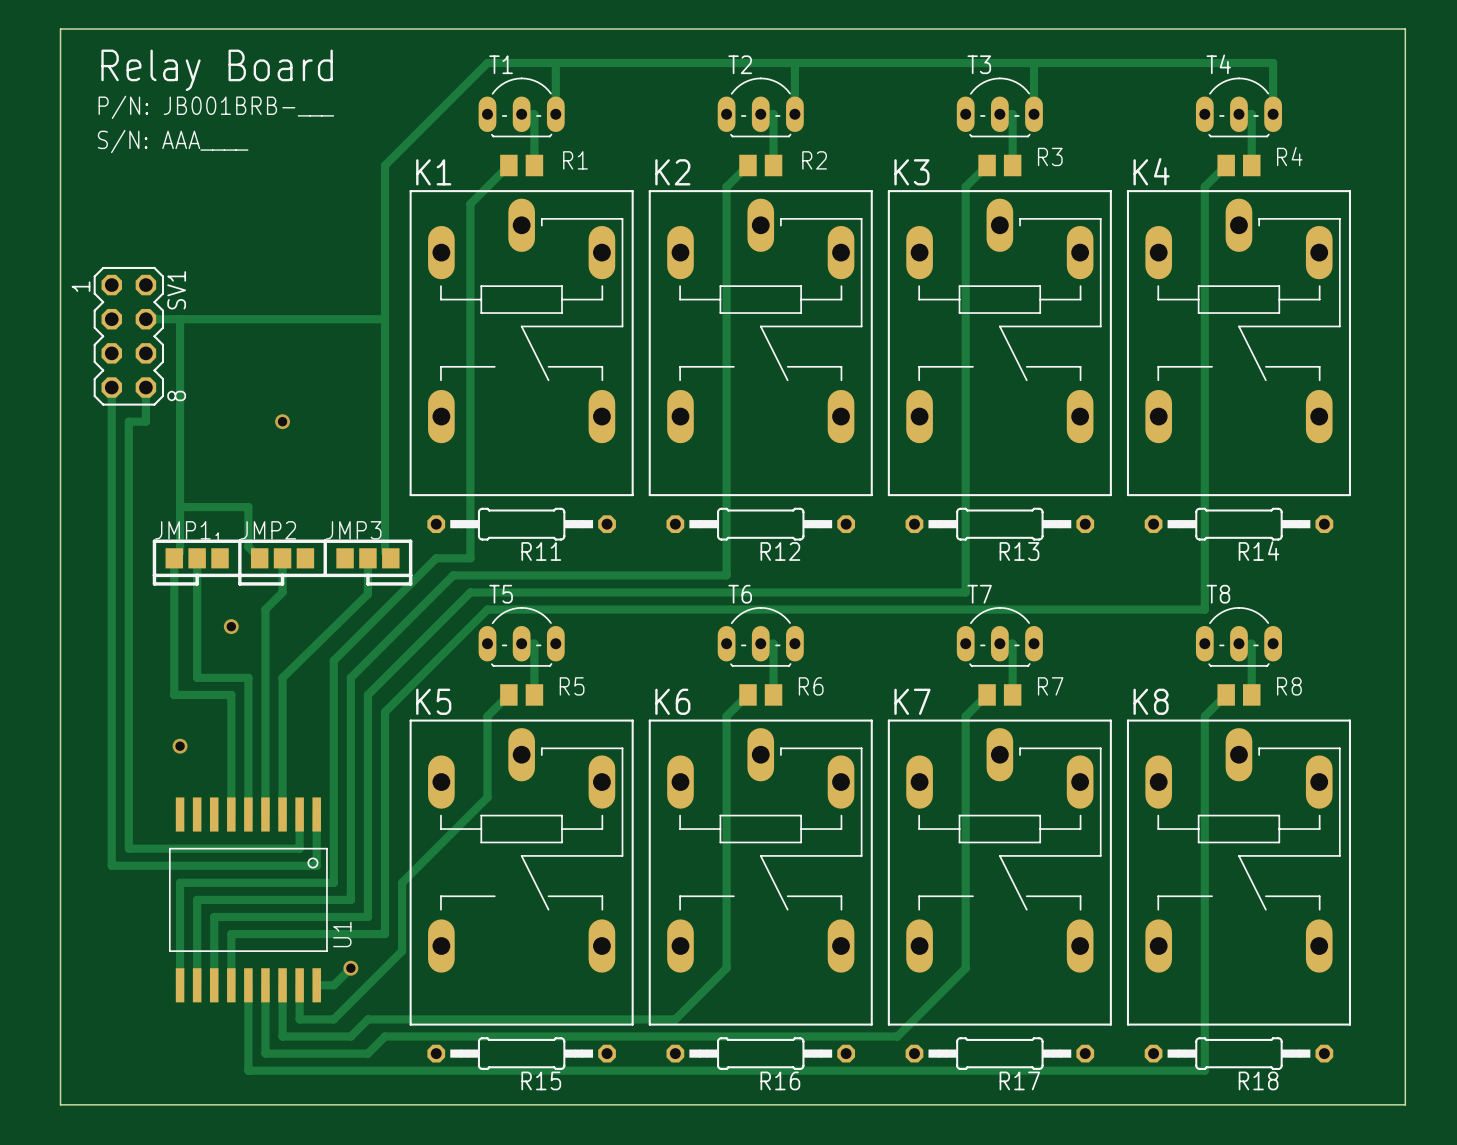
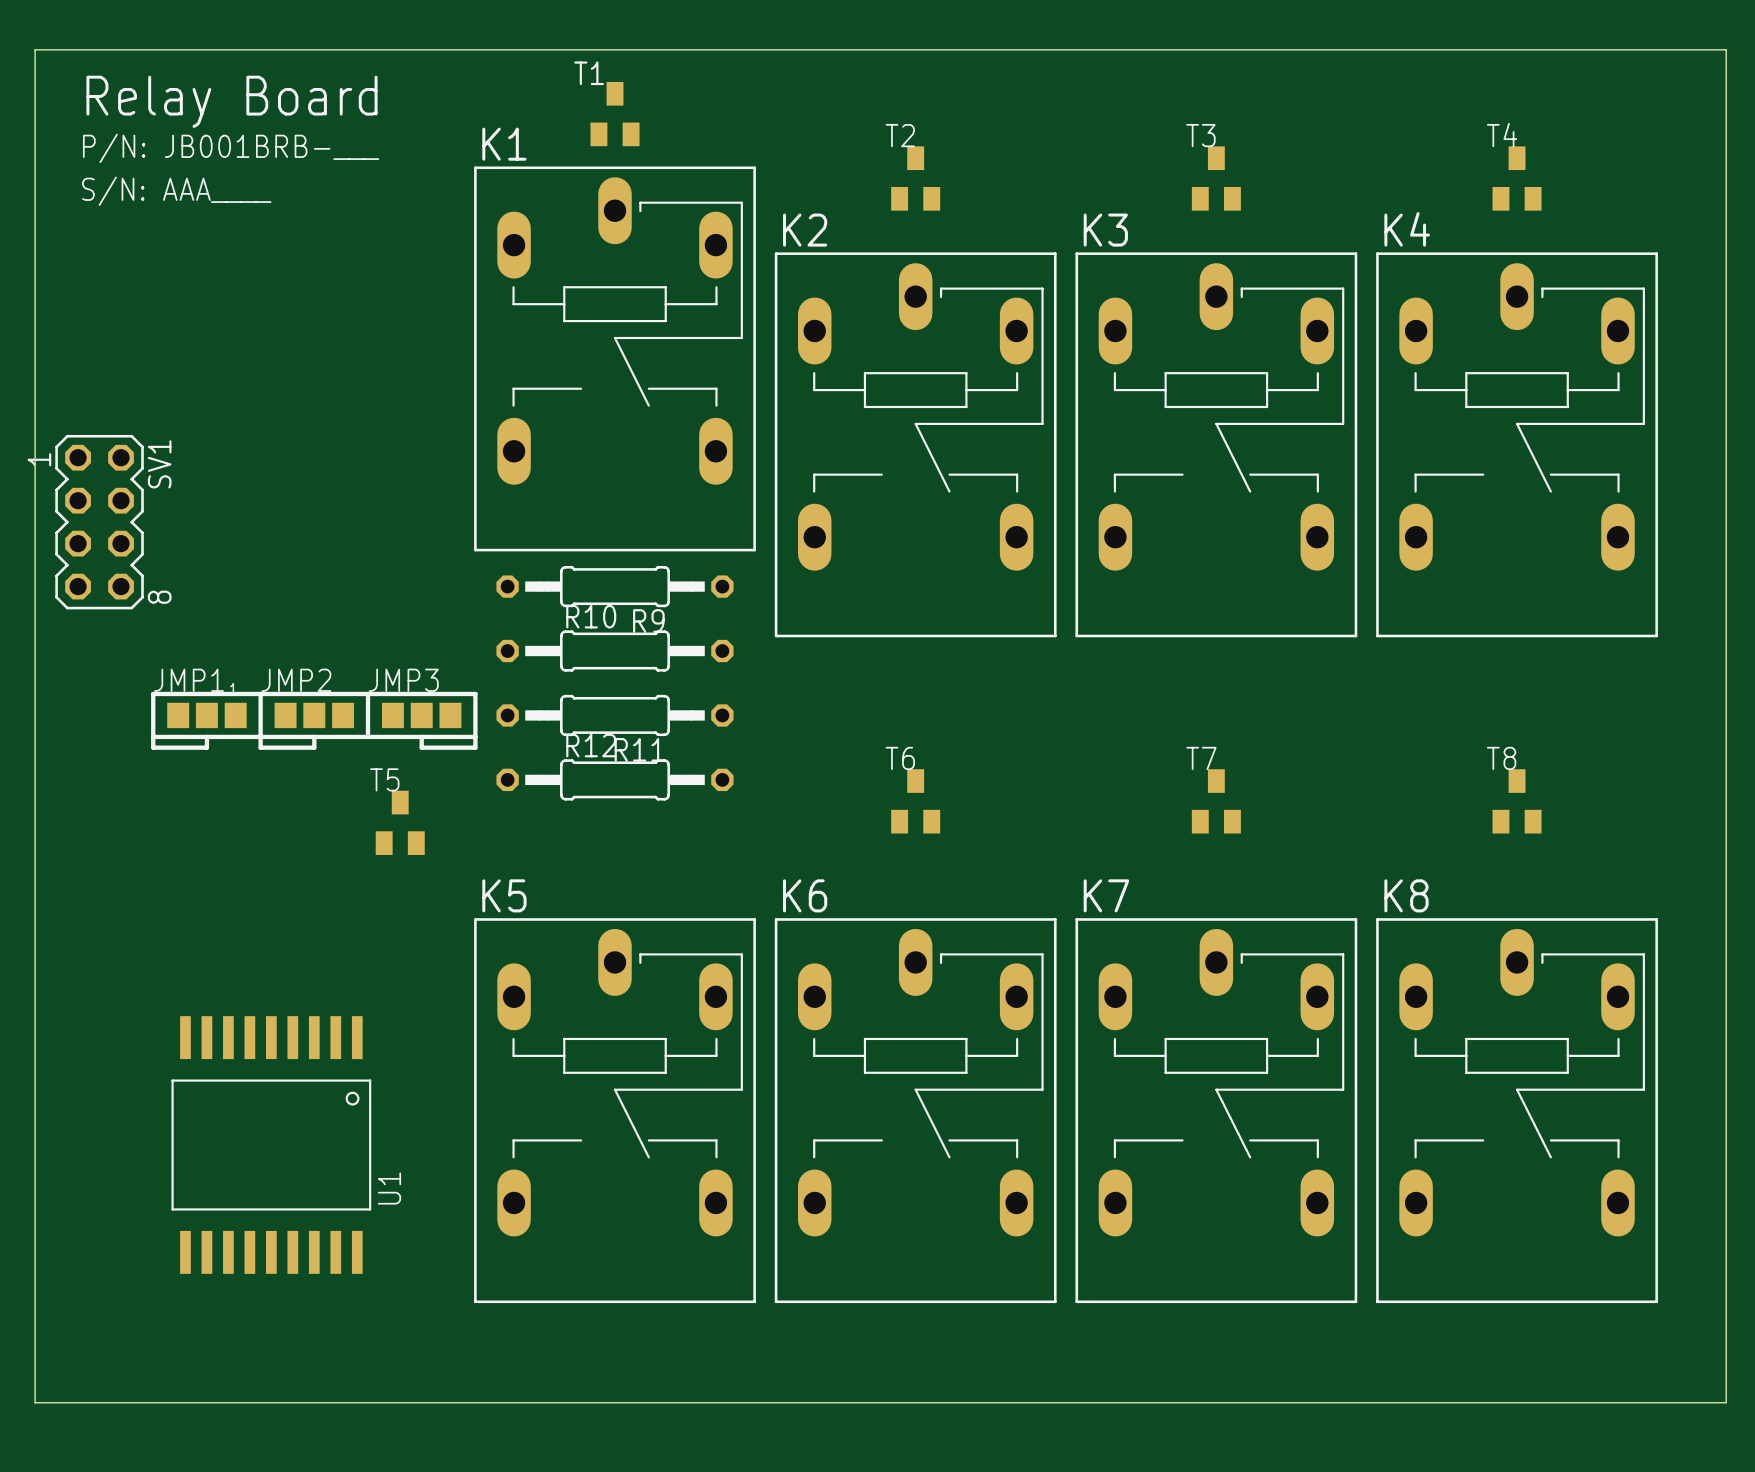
track: (555, 63) (555, 114) -> none
track: (794, 63) (794, 114) -> none
track: (1034, 63) (1034, 114) -> none
T1 footprint: [478, 77, 565, 138] -> [590, 81, 640, 147]
T2 footprint: [717, 77, 804, 138] -> [891, 146, 941, 211]
T3 footprint: [956, 77, 1043, 138] -> [1191, 146, 1241, 211]
T4 footprint: [1195, 77, 1283, 138] -> [1492, 146, 1542, 211]
track: (521, 114) (534, 114) (534, 165) -> none
track: (760, 114) (773, 114) (773, 165) -> none
track: (999, 114) (1012, 114) (1012, 165) -> none
track: (1238, 114) (1251, 114) (1251, 165) -> none
track: (1273, 114) (1273, 63) (487, 63) (385, 165) (385, 552) (390, 558) -> none
track: (508, 165) (470, 203) (470, 558) (436, 558) (333, 660) (333, 882) (180, 882) (180, 985) -> none
R1: (521, 165) -> none
track: (747, 165) (726, 186) (726, 575) (453, 575) (350, 677) (350, 899) (197, 899) (197, 985) -> none
R2: (760, 165) -> none
track: (987, 165) (965, 186) (965, 592) (470, 592) (367, 694) (367, 916) (214, 916) (214, 985) -> none
R3: (999, 165) -> none
track: (1226, 165) (1204, 186) (1204, 609) (487, 609) (385, 712) (385, 934) (231, 934) (231, 985) -> none
R4: (1238, 165) -> none
track: (145, 319) (385, 319) -> none
track: (180, 319) (180, 552) (174, 558) (174, 694) (231, 694) (231, 814) -> none
SV1 position: (128, 336) -> (99, 522)
K1 position: (521, 343) -> (615, 358)
track: (111, 387) (111, 865) (316, 865) (316, 814) -> none
track: (145, 387) (145, 421) (128, 421) (128, 848) (299, 848) (299, 814) -> none
via: (282, 421) -> none
R9: none -> (615, 586)
track: (180, 507) (248, 507) (248, 547) (259, 558) -> none
R10: none -> (615, 651)
R11 position: (521, 524) -> (615, 715)
R12 position: (760, 524) -> (615, 779)
R13: (999, 524) -> none
R14: (1238, 524) -> none
R12 name position: R12 (780, 551) -> R12 (591, 745)
track: (197, 558) (197, 677) (248, 677) (248, 814) -> none
track: (282, 558) (282, 592) (265, 609) (265, 814) -> none
track: (367, 558) (367, 594) (282, 677) (282, 814) -> none
T5 footprint: [478, 606, 565, 667] -> [375, 790, 425, 855]
T6 footprint: [717, 606, 804, 667] -> [891, 769, 941, 834]
T7 footprint: [956, 606, 1043, 667] -> [1191, 769, 1241, 834]
T8 footprint: [1195, 606, 1283, 667] -> [1492, 769, 1542, 834]
via: (231, 626) -> none
track: (521, 643) (534, 643) (534, 694) -> none
track: (760, 643) (773, 643) (773, 694) -> none
track: (999, 643) (1012, 643) (1012, 694) -> none
track: (1238, 643) (1251, 643) (1251, 694) -> none
track: (508, 694) (487, 716) (487, 797) (402, 882) (402, 951) (333, 1019) (299, 1019) (299, 985) -> none
R5: (521, 694) -> none
track: (747, 694) (726, 716) (726, 968) (675, 1019) (367, 1019) (350, 1036) (282, 1036) (282, 985) -> none
R6: (760, 694) -> none
track: (987, 694) (965, 716) (965, 968) (897, 1036) (385, 1036) (367, 1053) (265, 1053) (265, 985) -> none
R7: (999, 694) -> none
track: (1226, 694) (1204, 716) (1204, 1070) (248, 1070) (248, 985) -> none
R8: (1238, 694) -> none
via: (180, 746) -> none
track: (350, 968) (333, 985) (316, 985) -> none
via: (350, 968) -> none
R15: (521, 1053) -> none
R16: (760, 1053) -> none
R17: (999, 1053) -> none
R18: (1238, 1053) -> none

